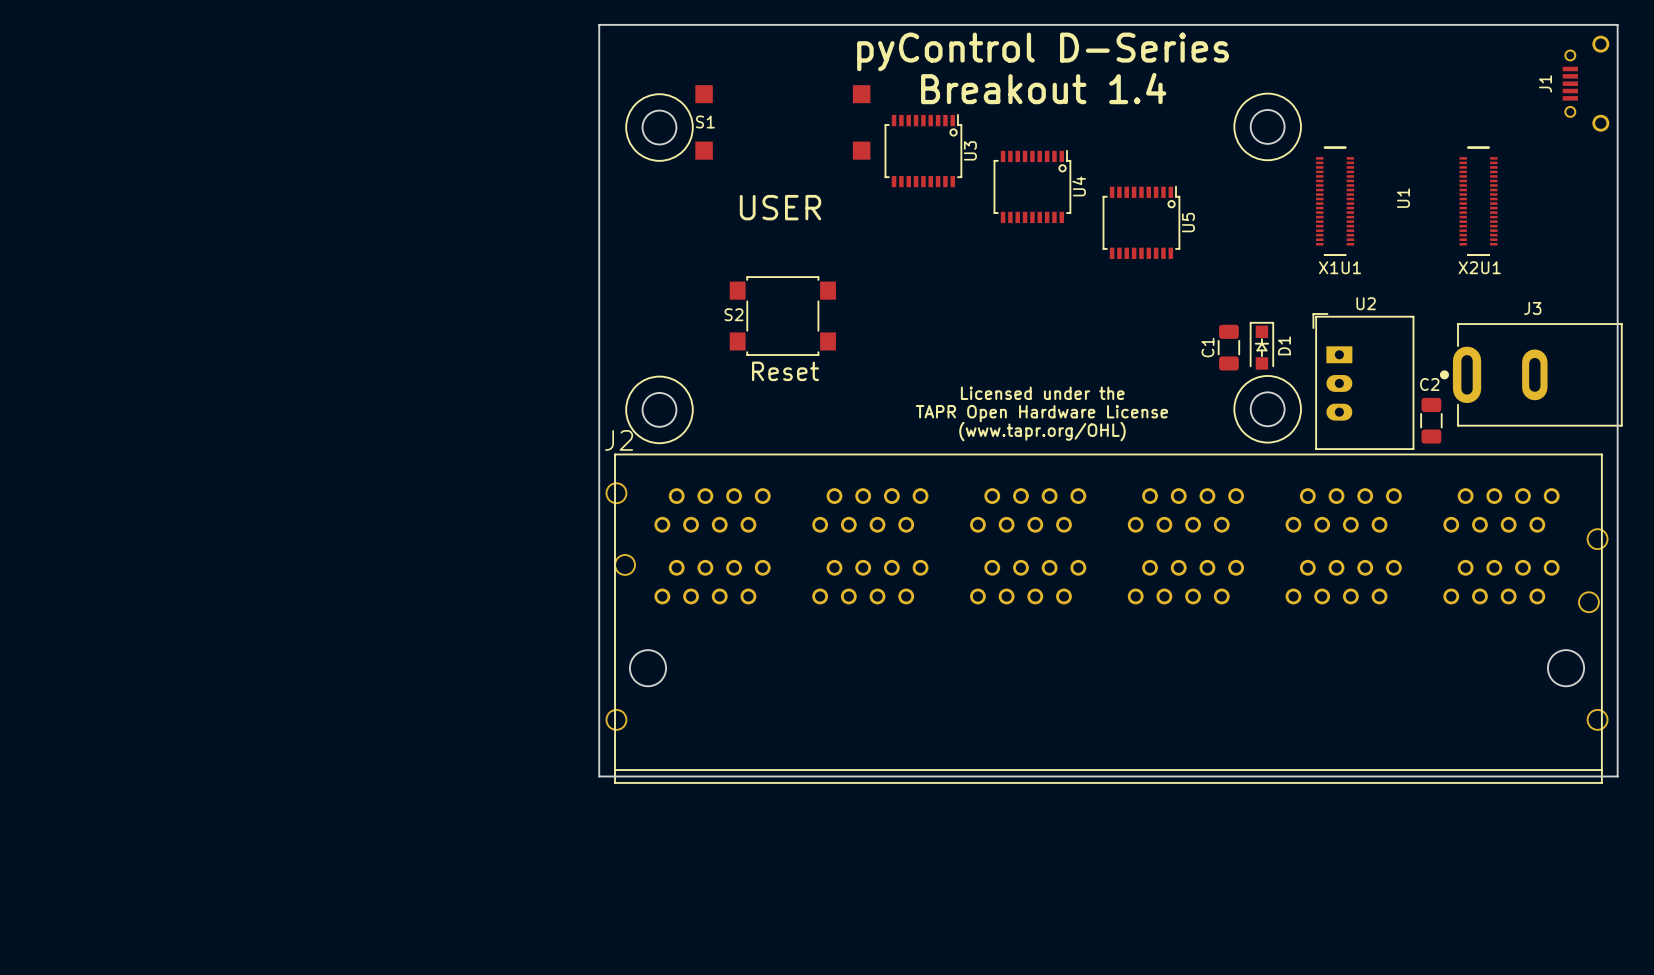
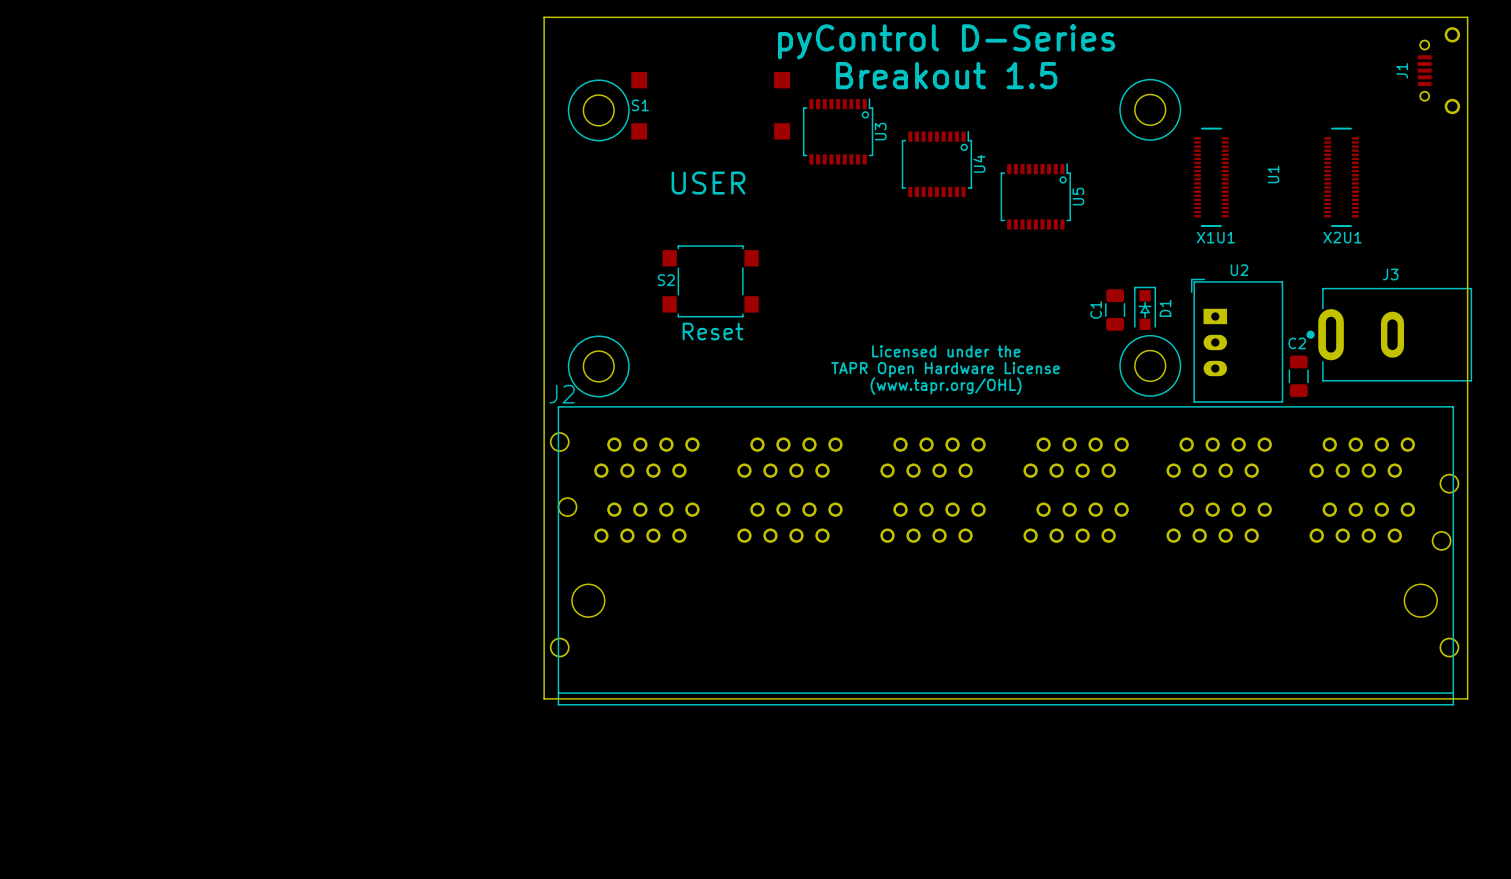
text: Breakout 1.4 (1043, 88) -> Breakout 1.5 (946, 75)

